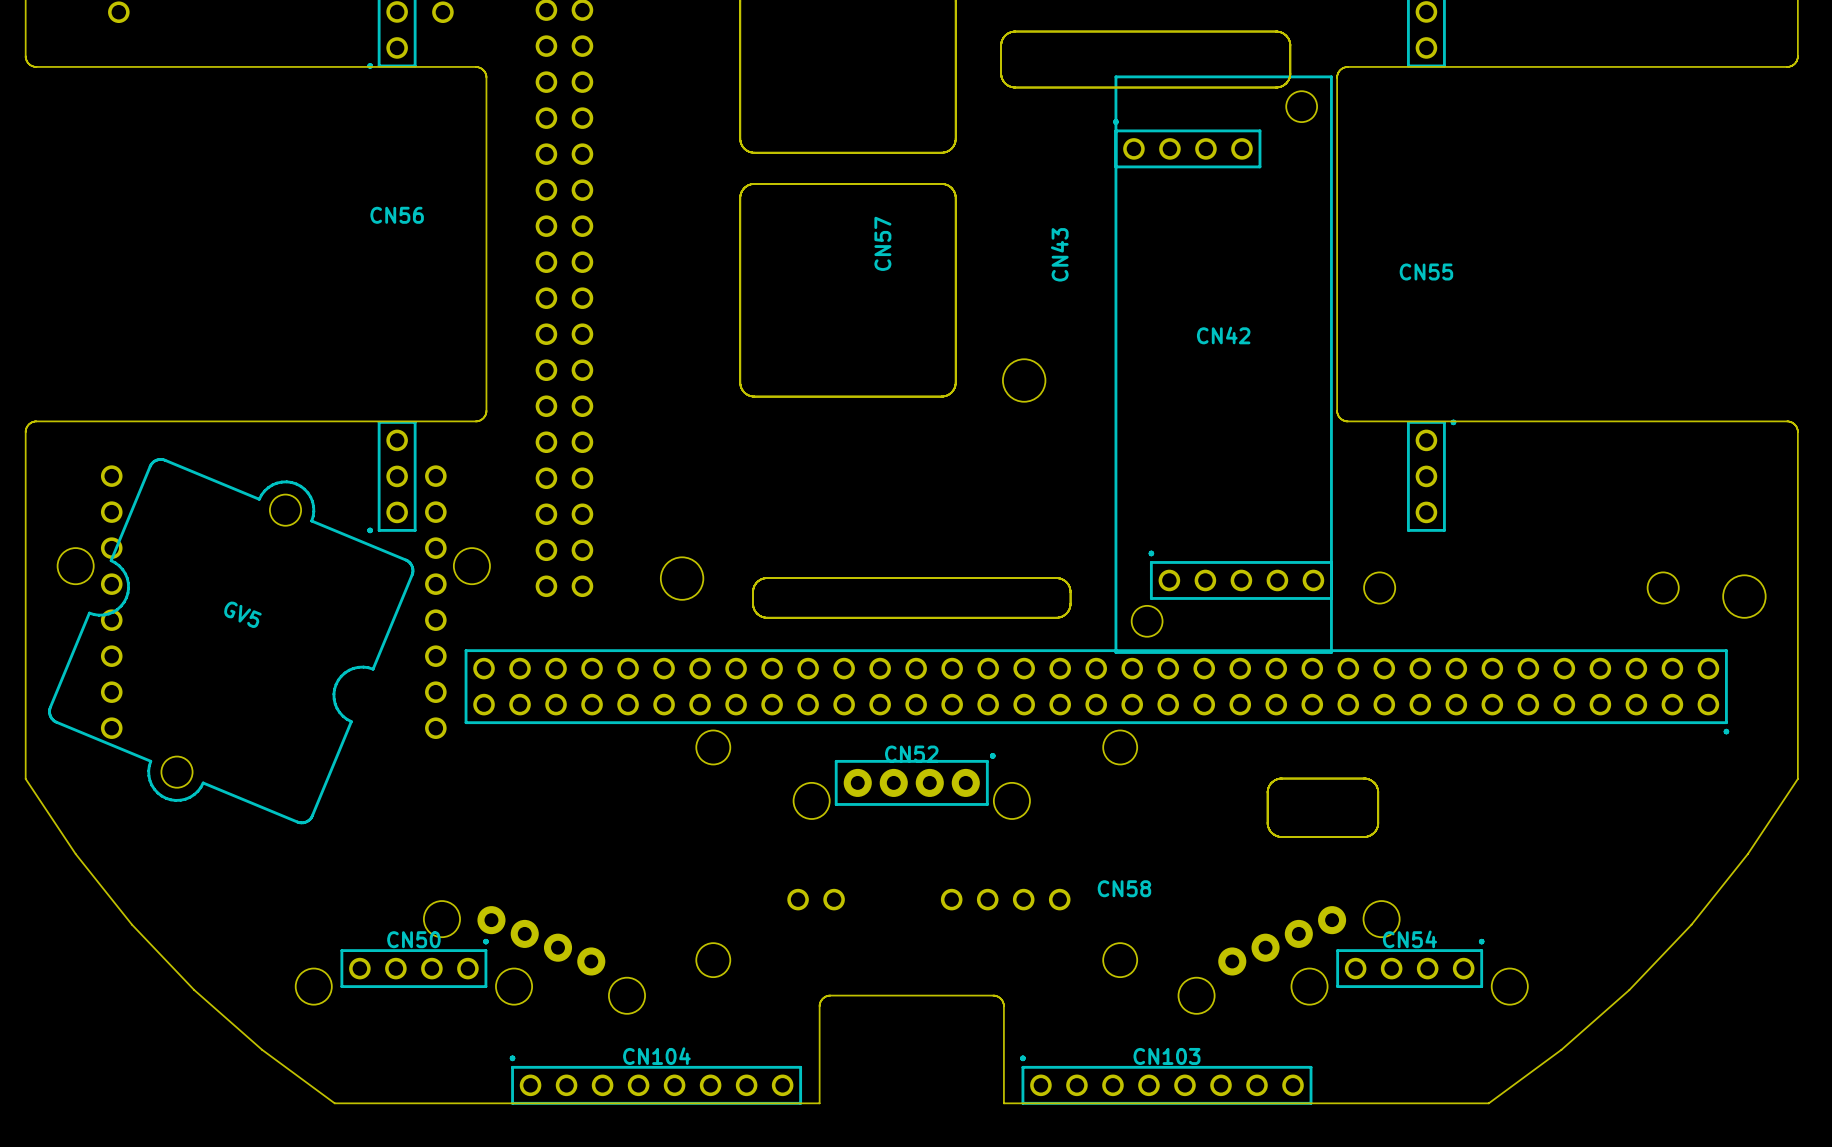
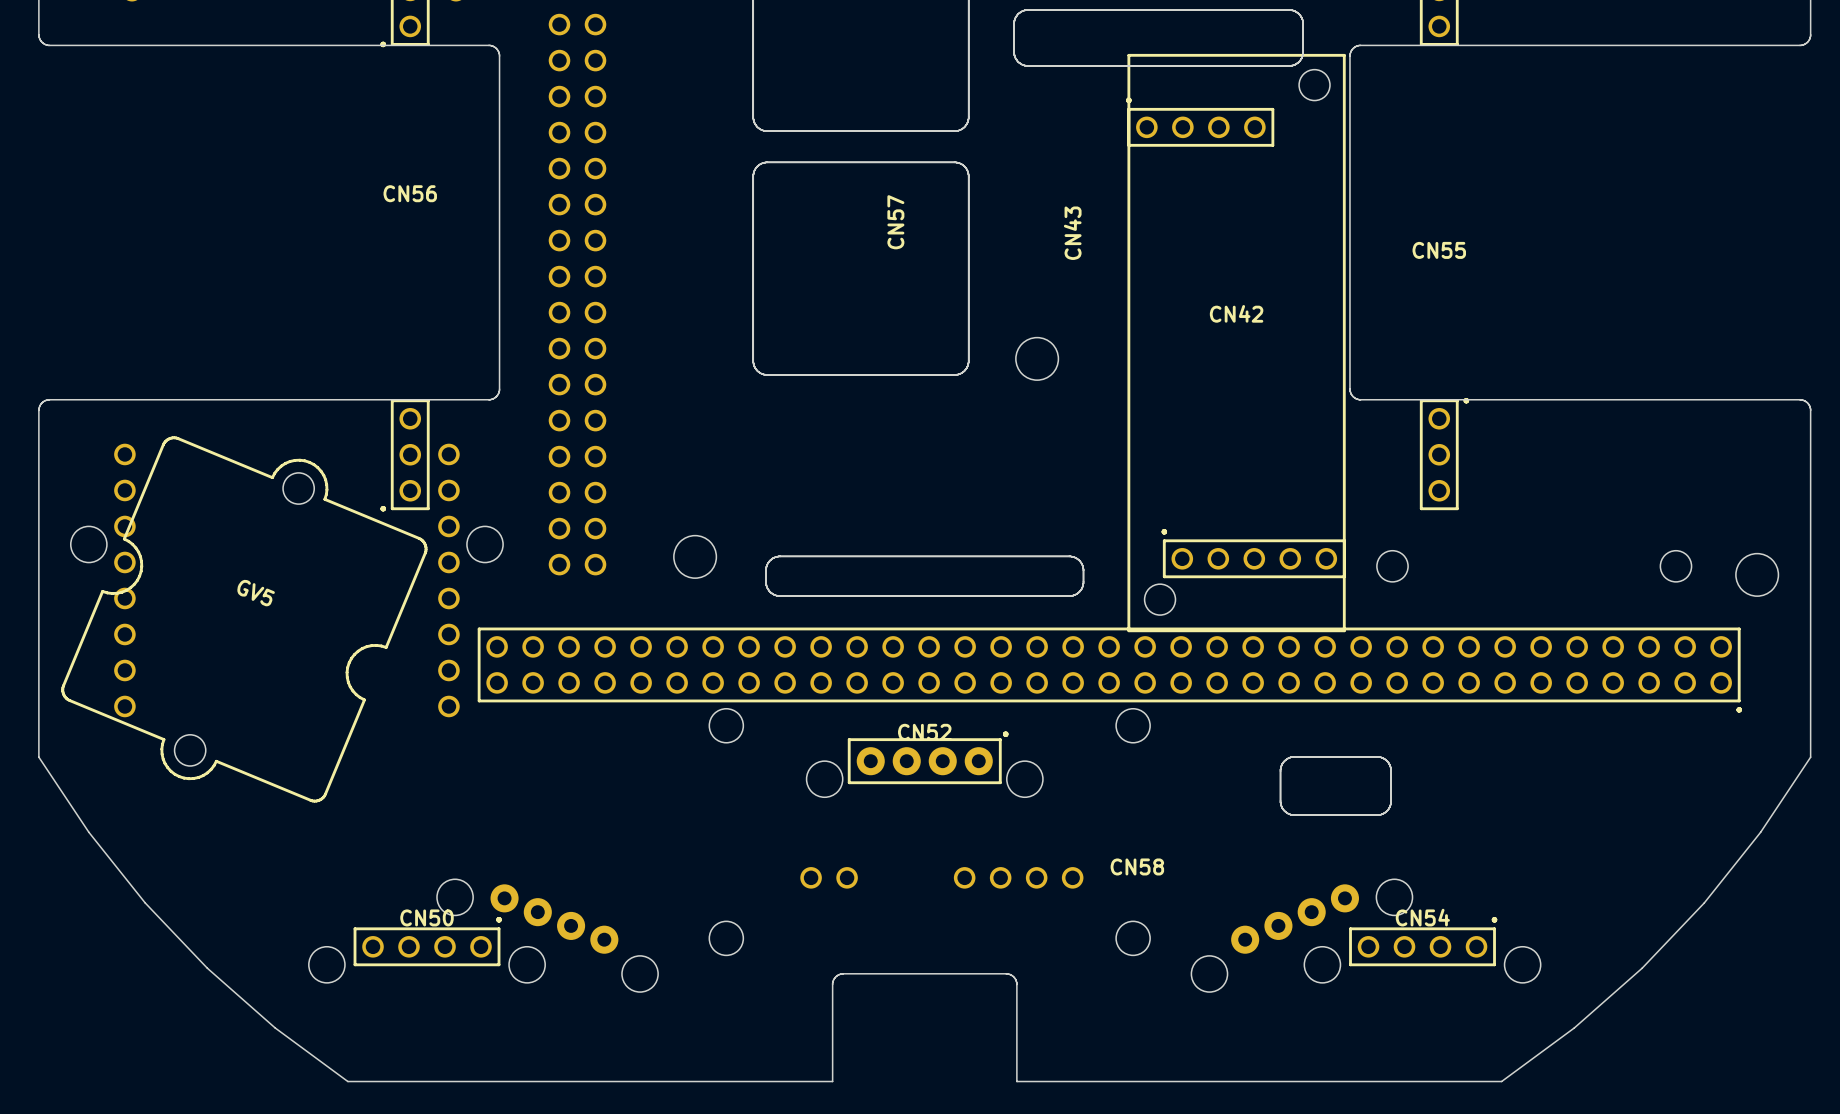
CN104: (655, 1080) -> none
CN103: (1166, 1080) -> none

